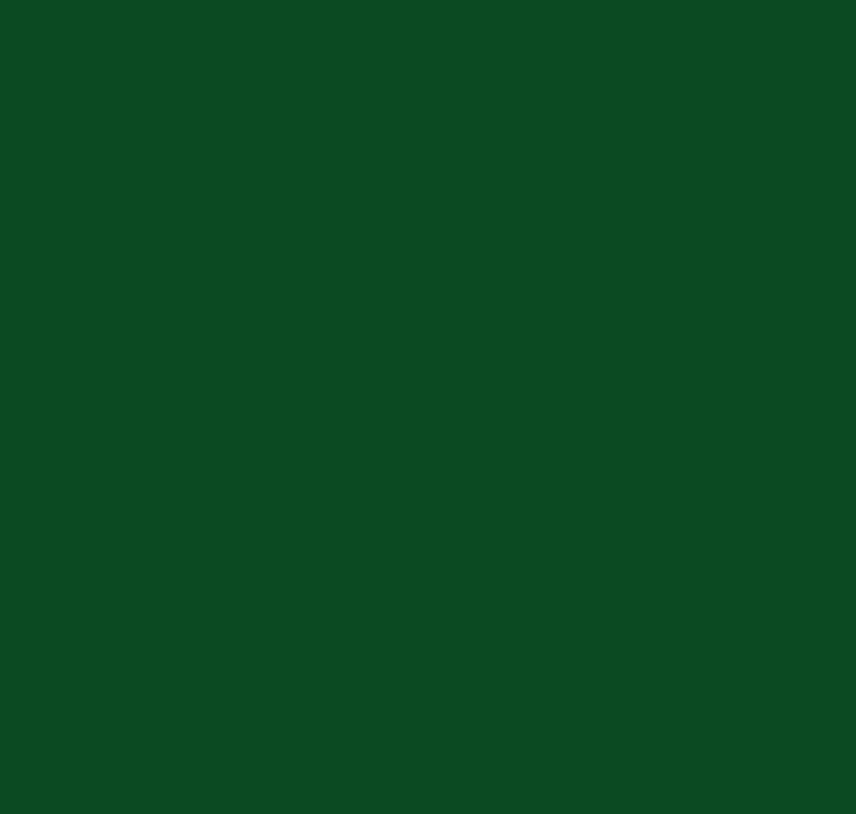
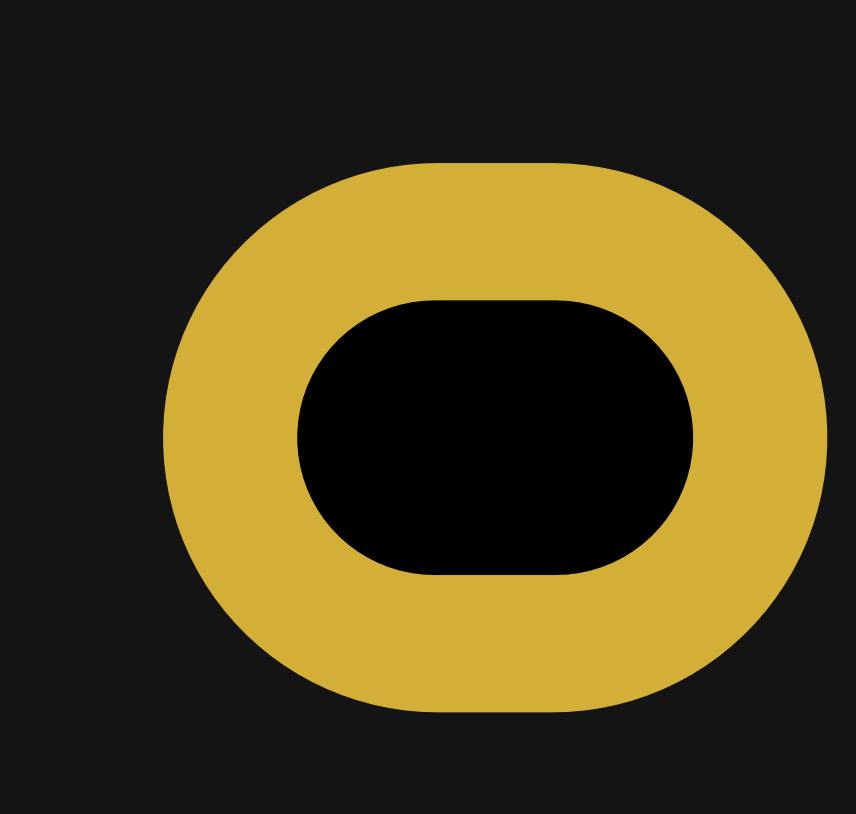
part: none -> (495, 437)

